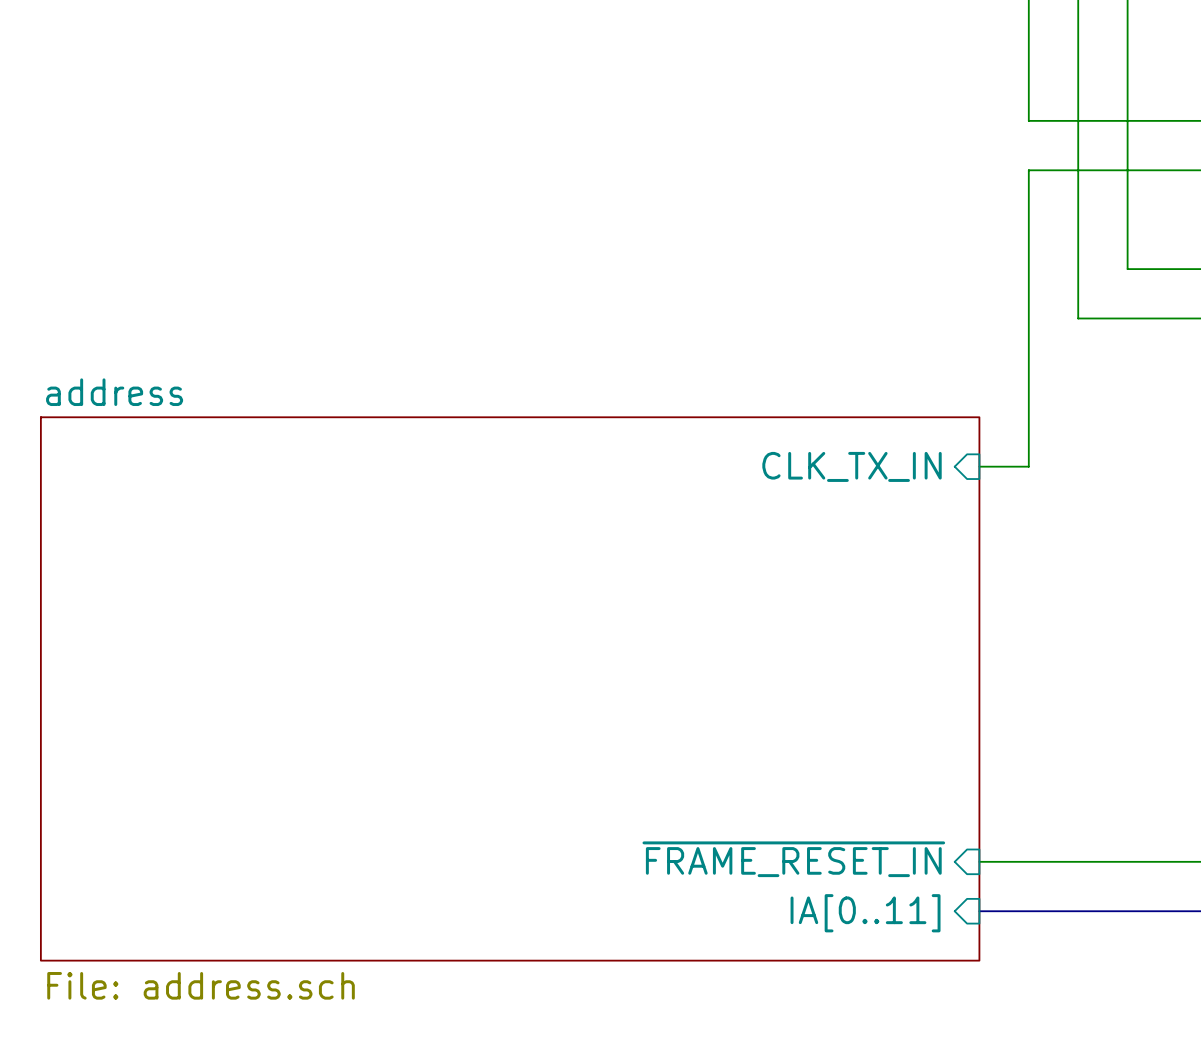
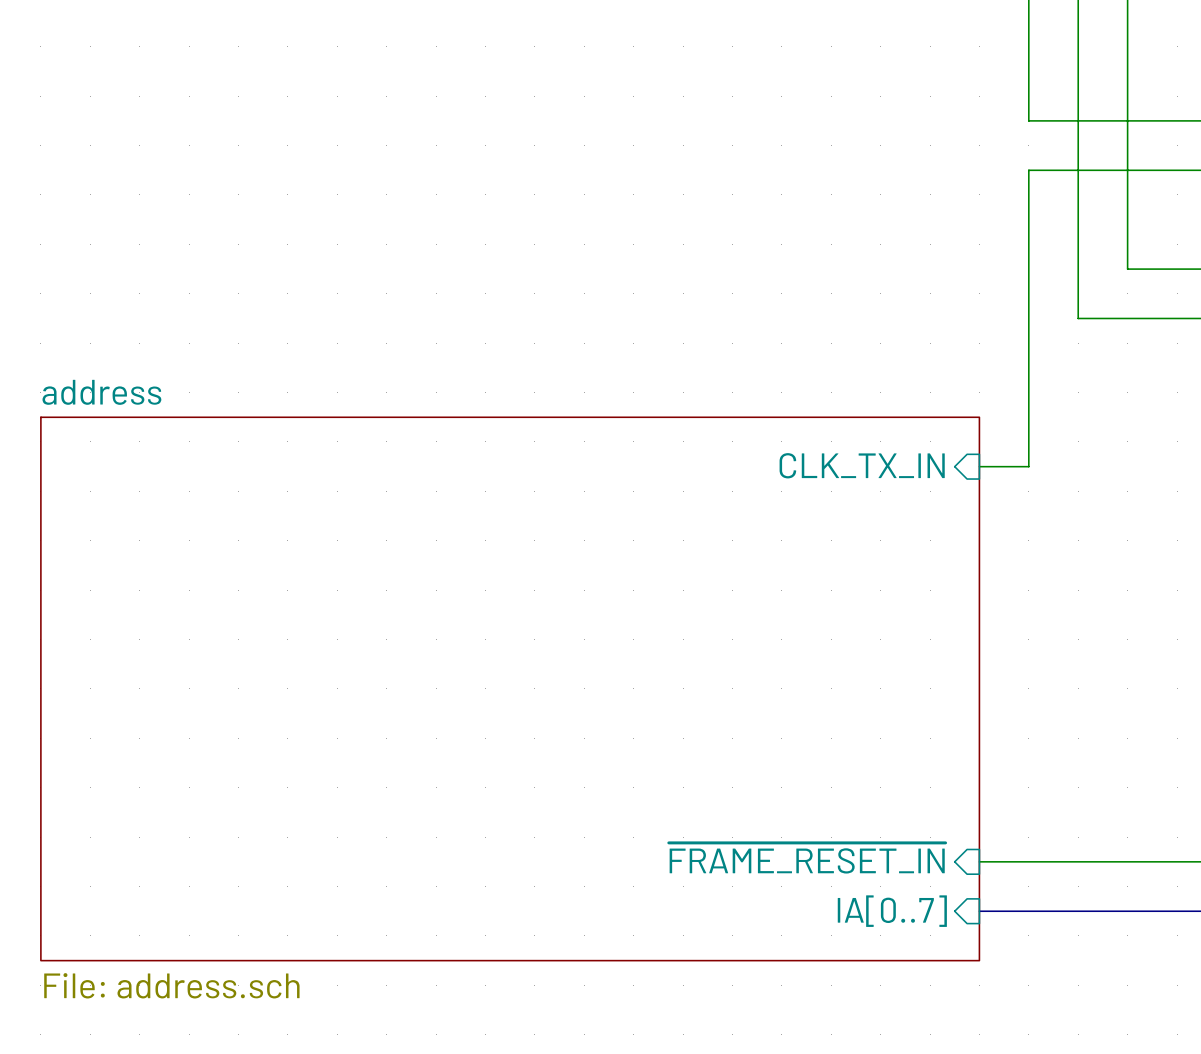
sheet pin: IA[0..11] (865, 913) -> IA[0..7] (892, 911)

